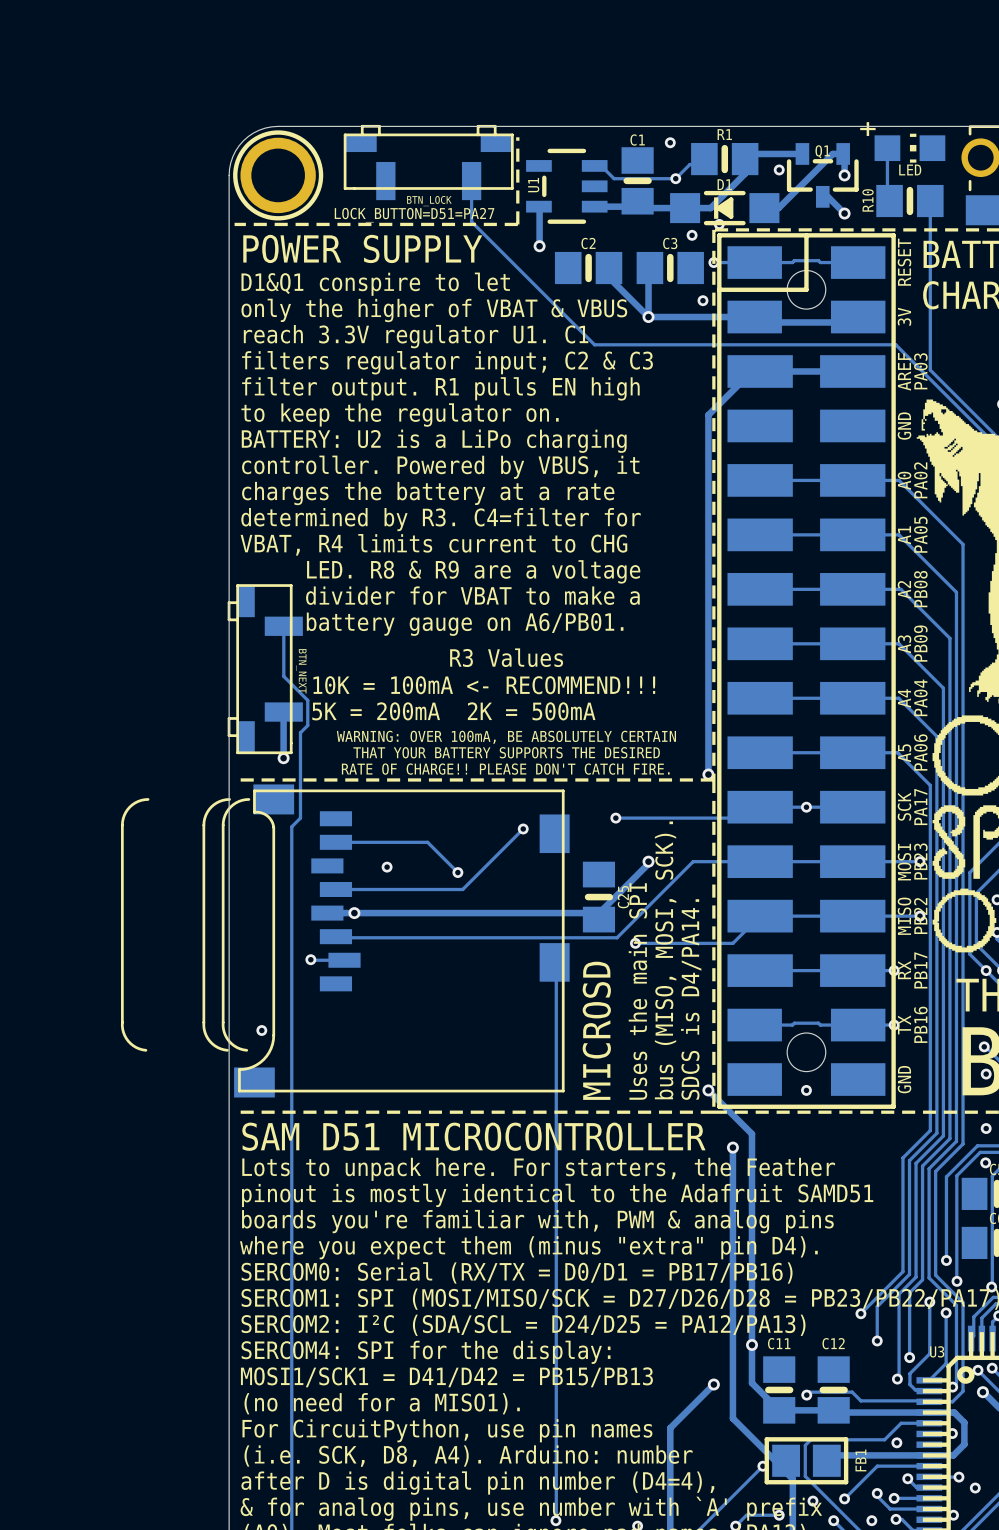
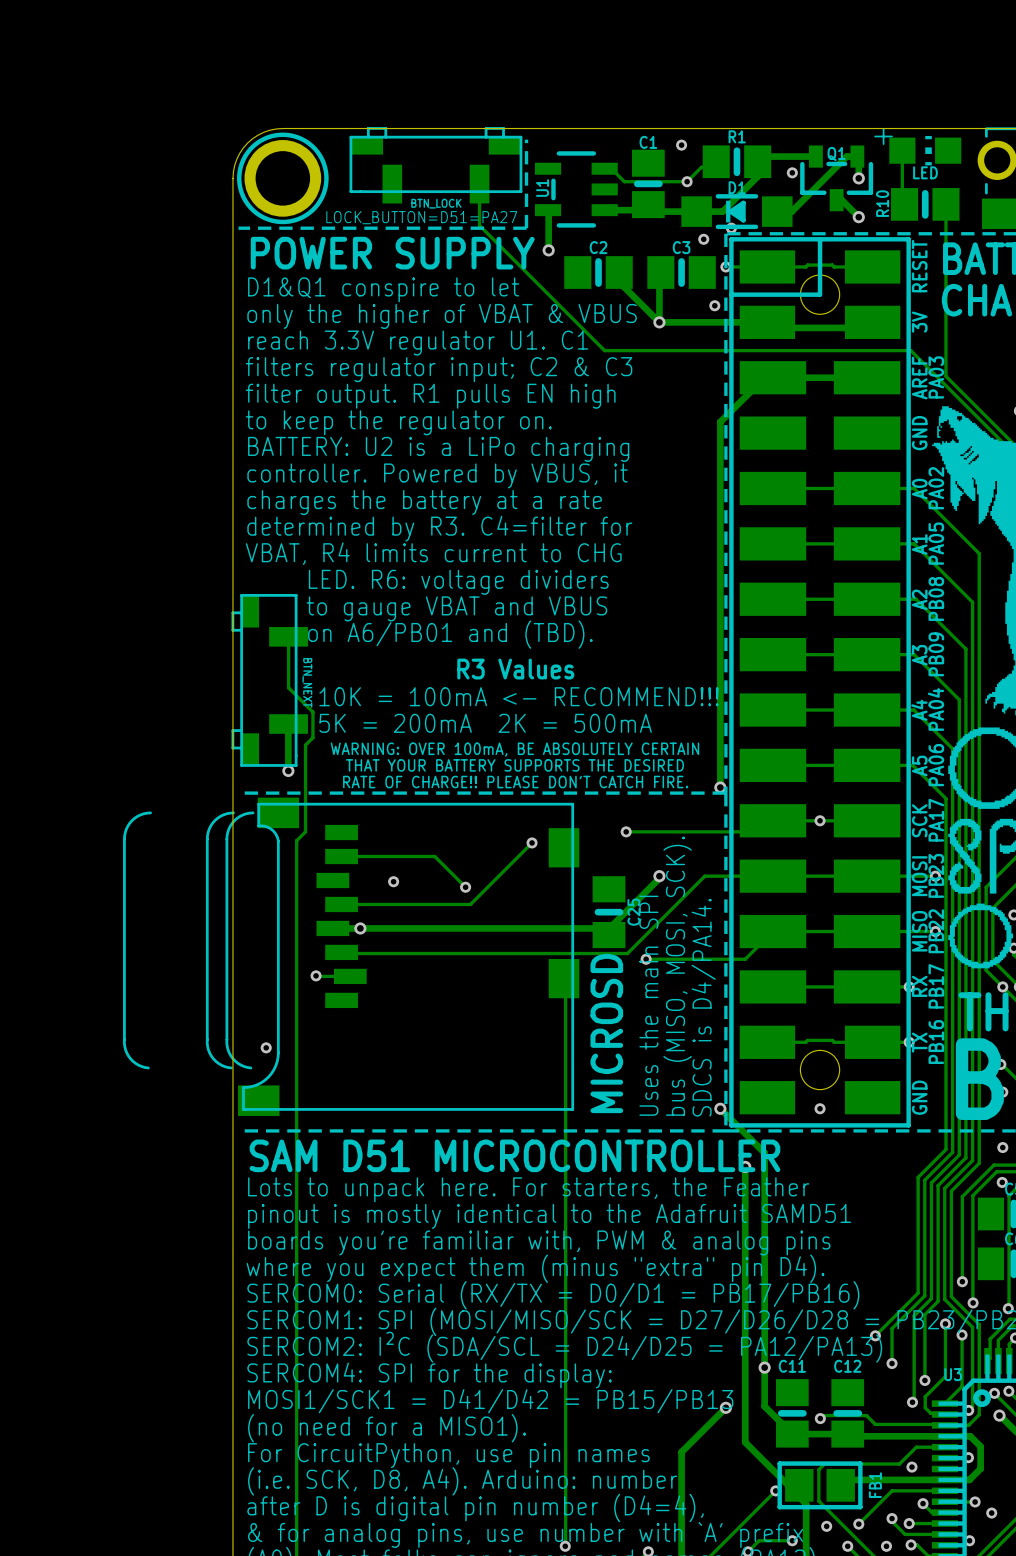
text: LED. R8 & R9 are a voltage (473, 571) -> LED. R6: voltage dividers (458, 582)
text: divider for VBAT to make a (472, 595) -> to gauge VBAT and VBUS (456, 608)
text: battery gauge on A6/PB01. (465, 624) -> on A6/PB01 and (TBD). (450, 634)

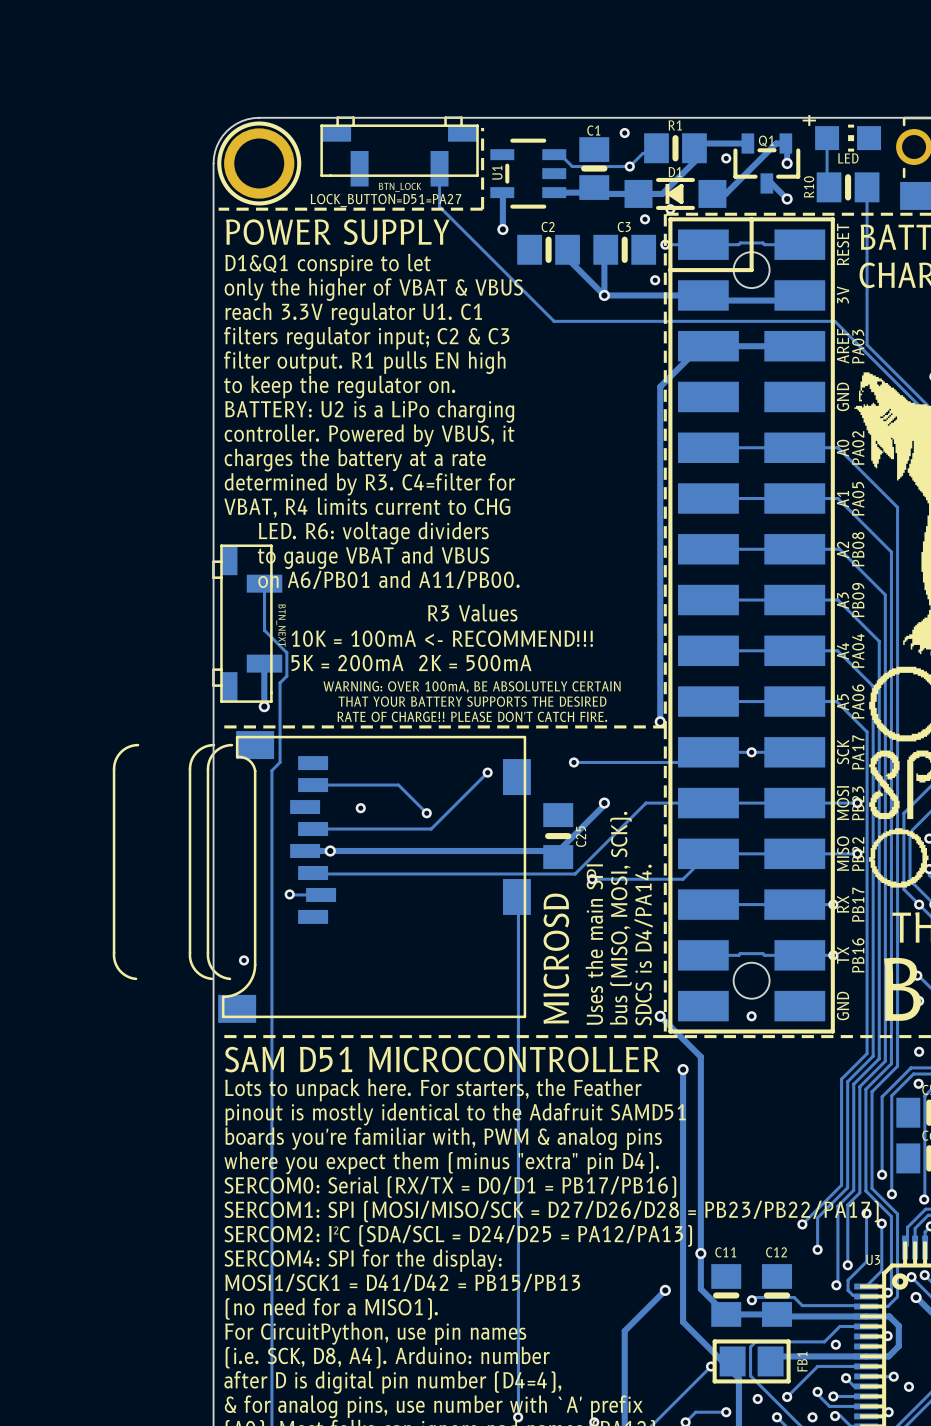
text: on A6/PB01 and (TBD). (450, 634) -> on A6/PB01 and A11/PB00. (388, 579)

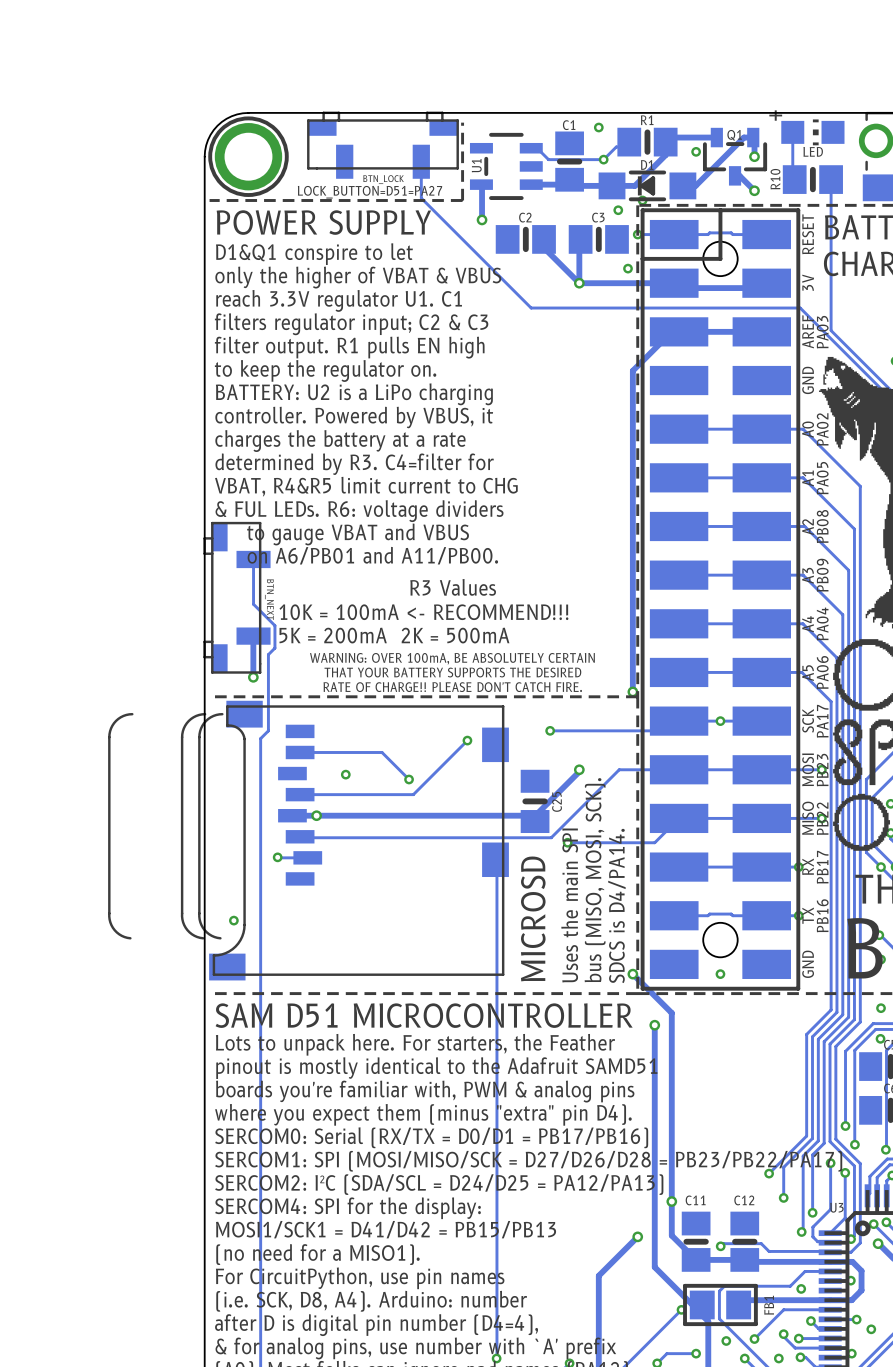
text: VBAT, R4 limits current to CHG (367, 507) -> VBAT, R4&R5 limit current to CHG (366, 486)
text: LED. R6: voltage dividers (373, 533) -> & FUL LEDs. R6: voltage dividers (359, 511)

